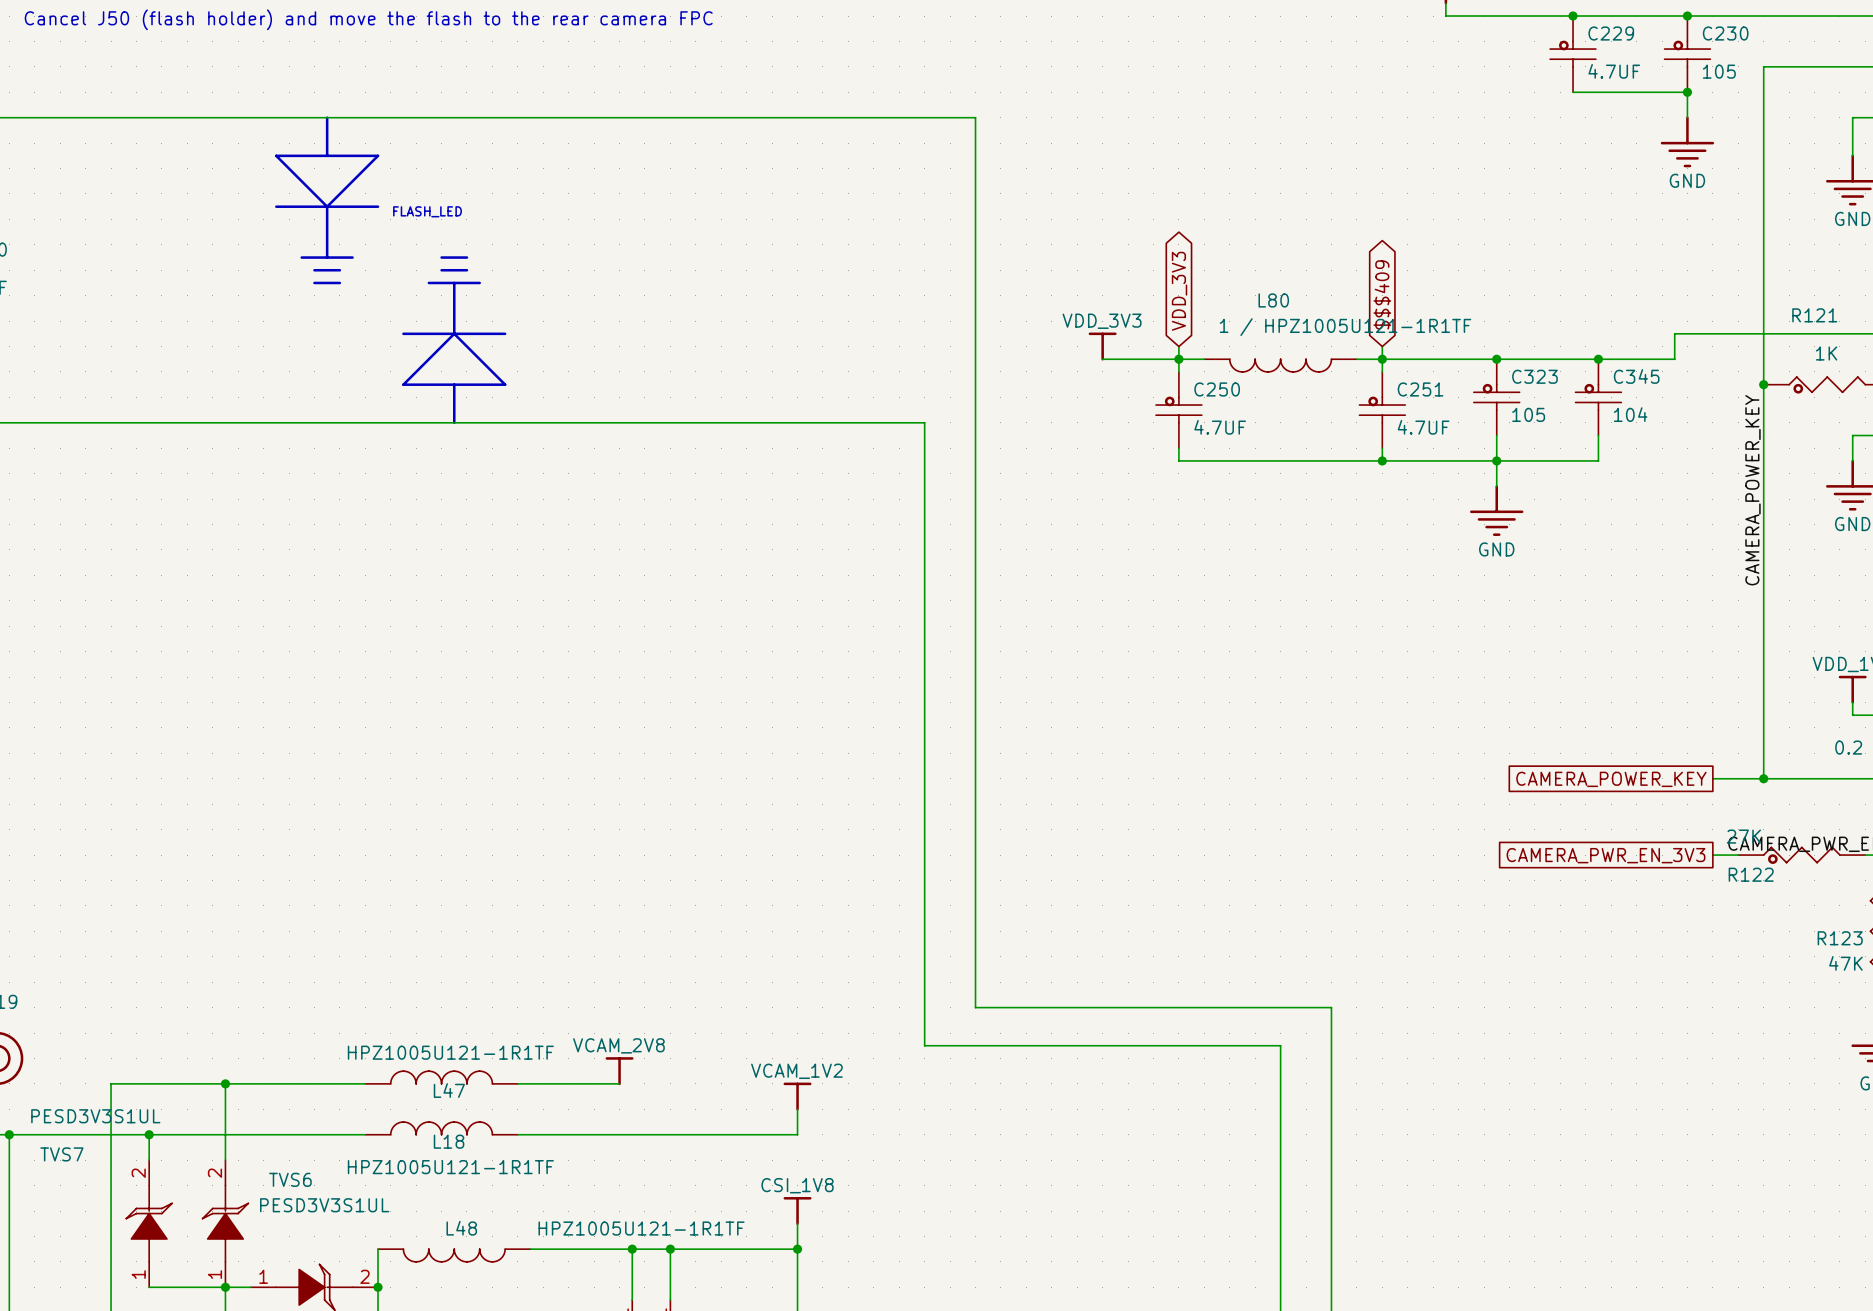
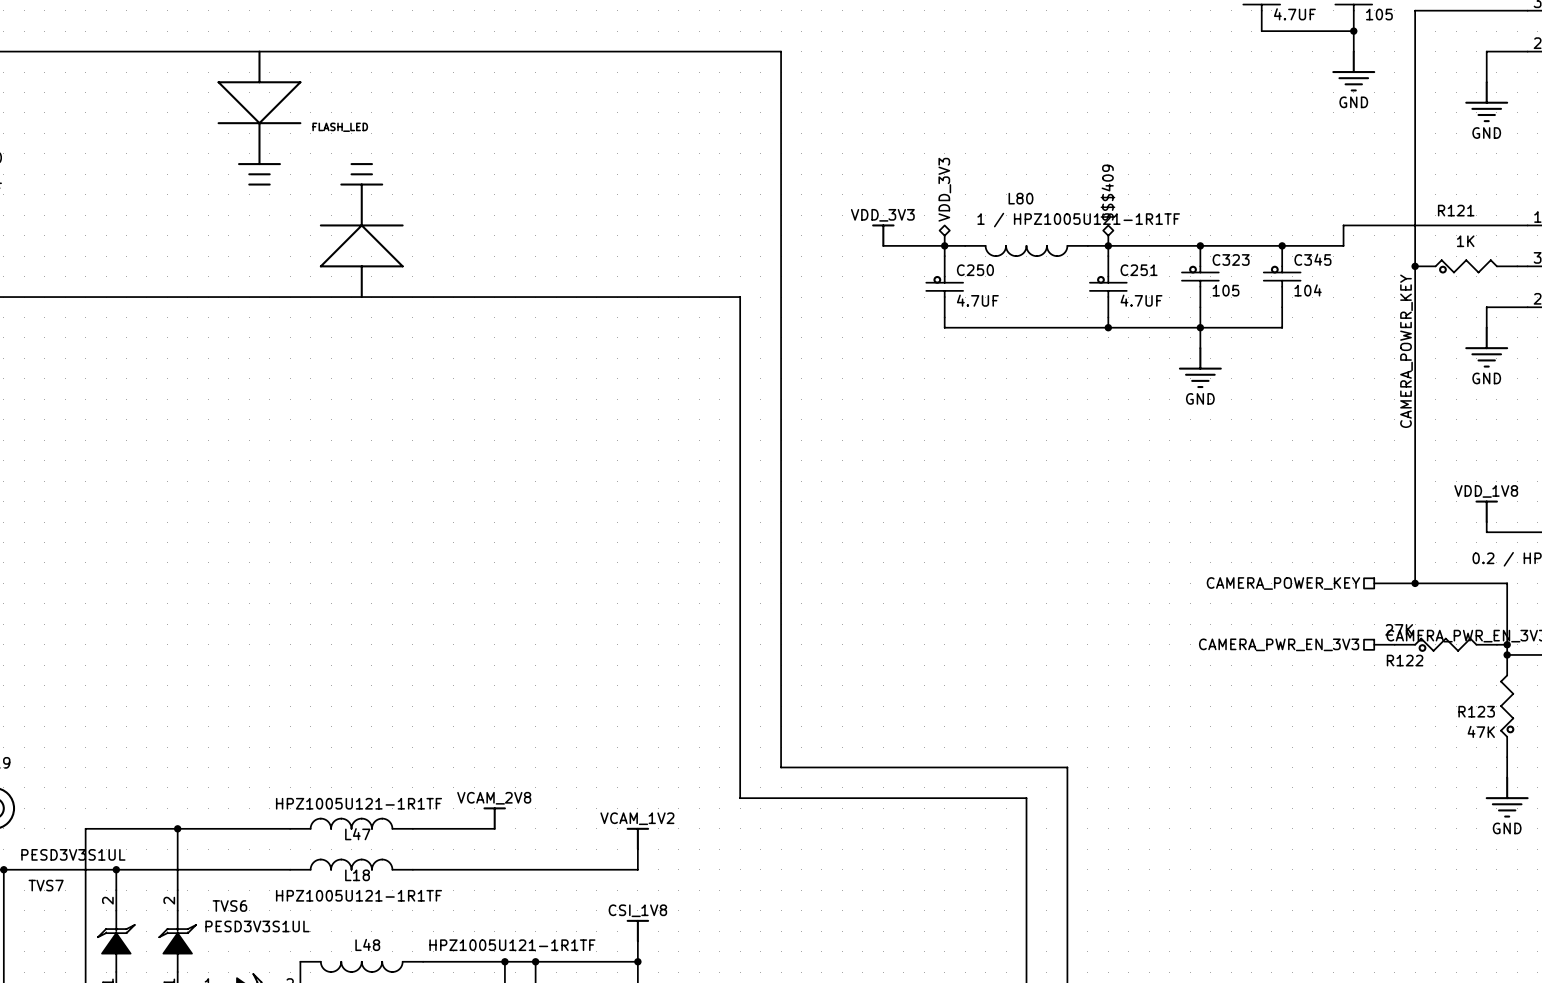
hierarchical label: none -> VDD_3V3 (944, 189)
global label: VDD_3V3 (1179, 291) -> none
hierarchical label: none -> $$$409 (1107, 192)
global label: $$$409 (1382, 294) -> none
hierarchical label: none -> CAMERA_POWER_KEY (1283, 583)
global label: CAMERA_POWER_KEY (1611, 779) -> none
hierarchical label: none -> CAMERA_PWR_EN_3V3 (1279, 644)
global label: CAMERA_PWR_EN_3V3 (1605, 855) -> none

